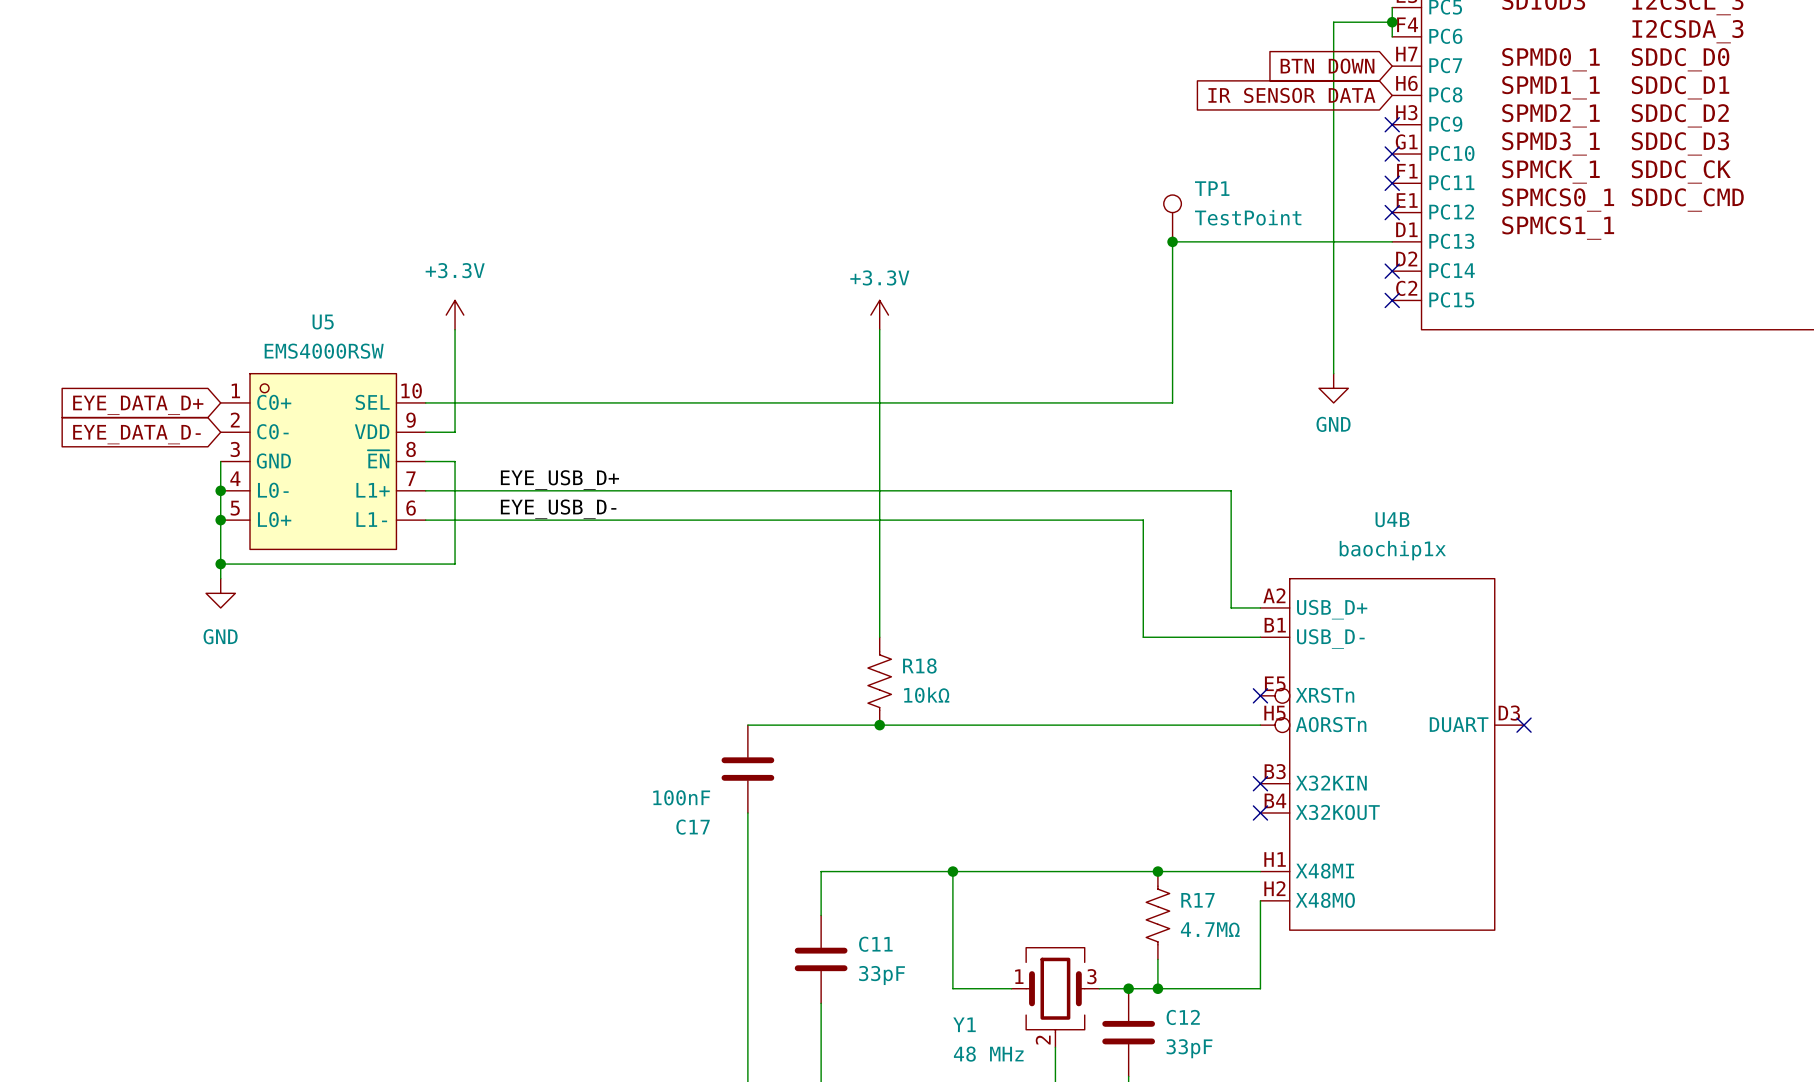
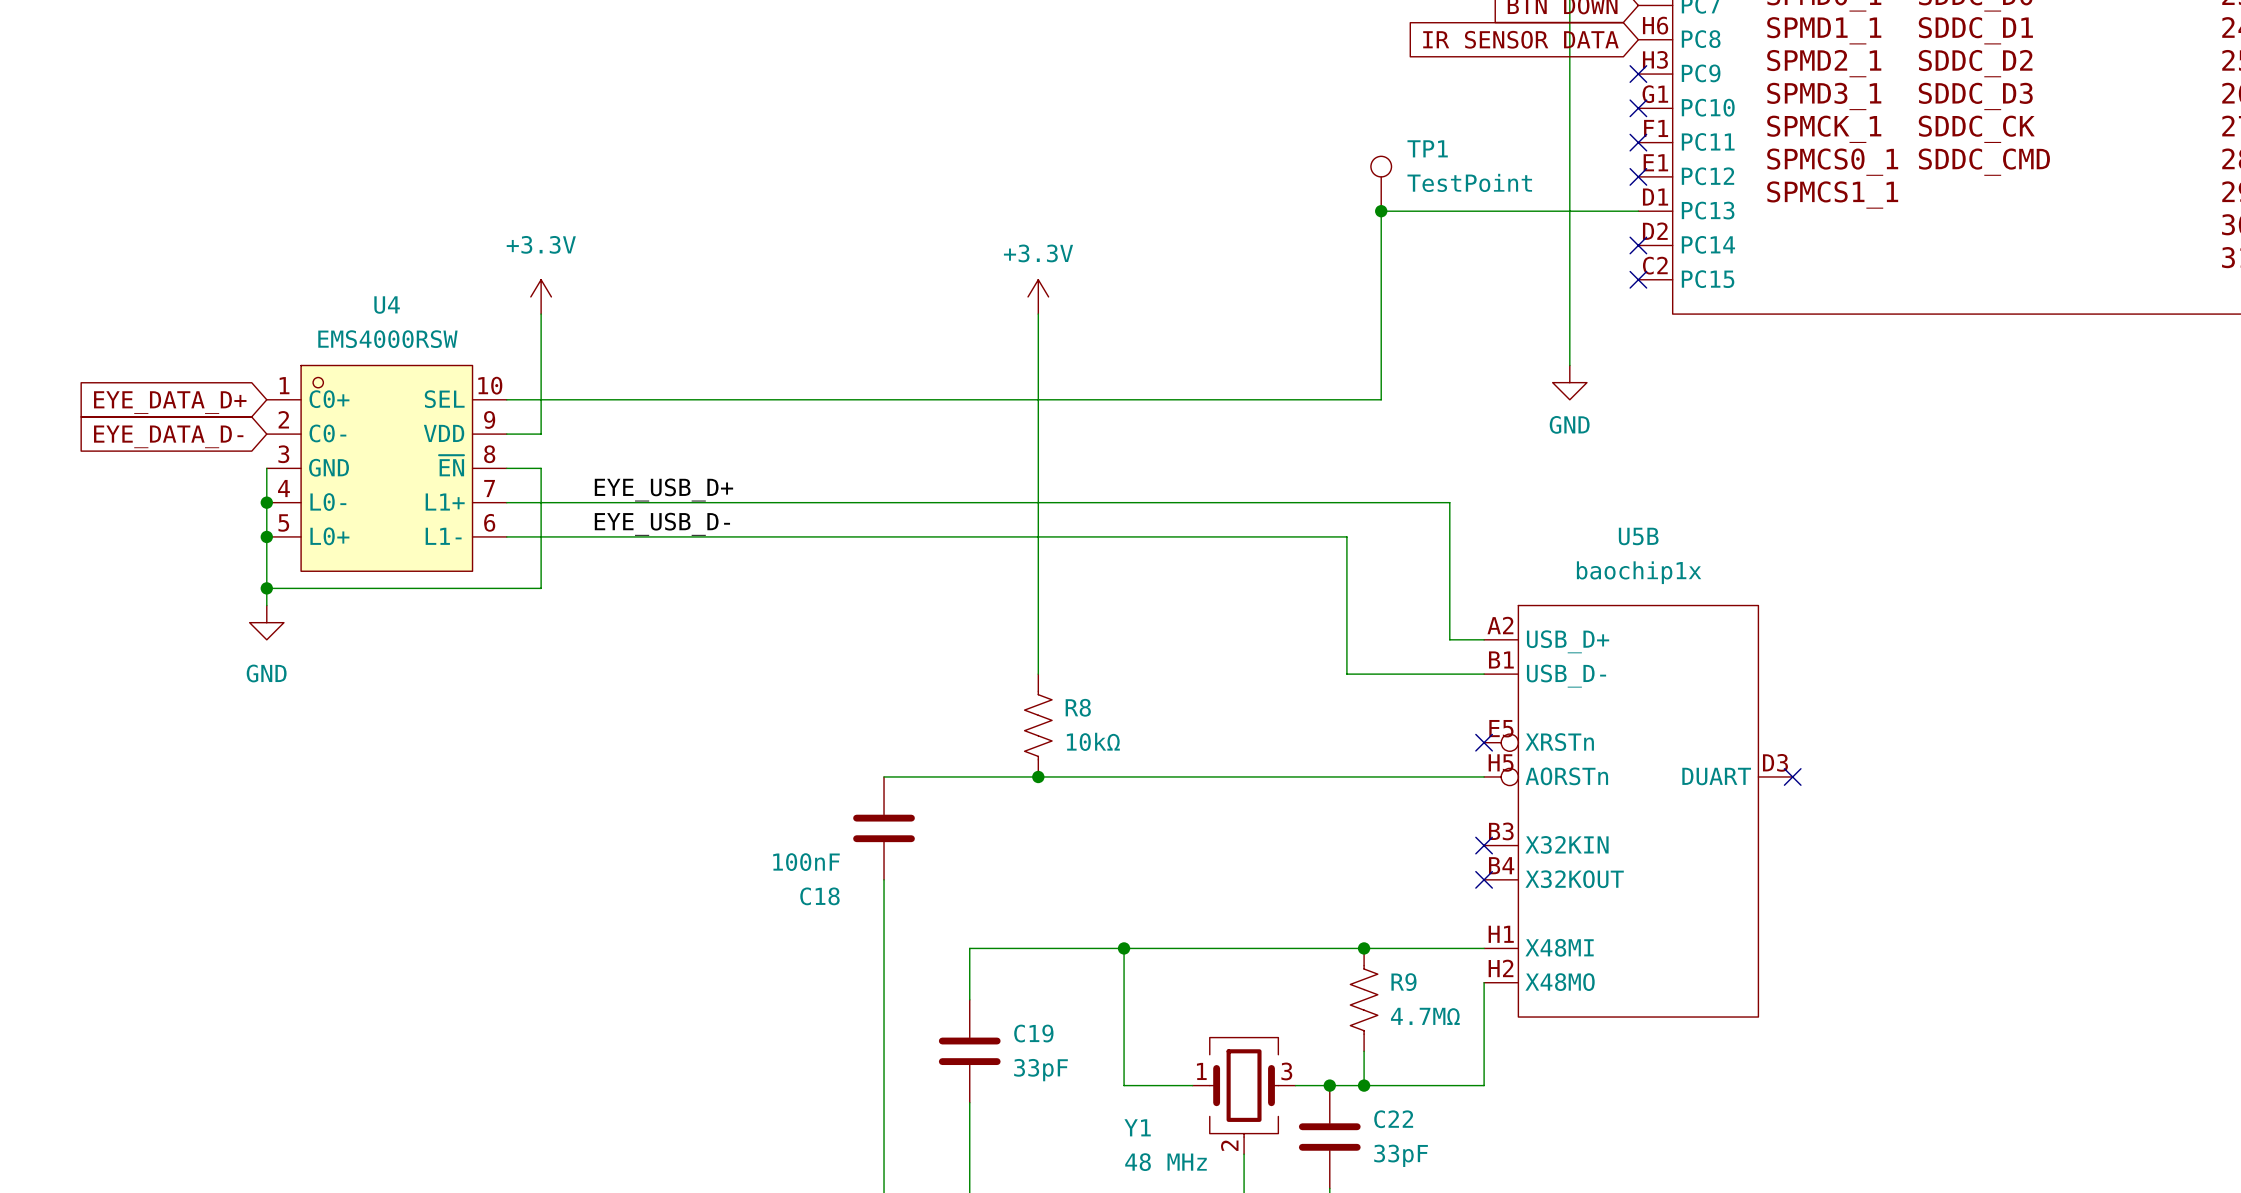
U5 name: U5 (323, 322) -> U4 (387, 305)
U4B name: U4B (1392, 519) -> U5B (1638, 536)
R18 name: R18 (919, 666) -> R8 (1078, 707)
C17 name: C17 (693, 827) -> C18 (819, 896)
R17 name: R17 (1197, 900) -> R9 (1403, 982)
C11 name: C11 (875, 944) -> C19 (1033, 1033)
C12 name: C12 (1183, 1017) -> C22 (1393, 1119)

